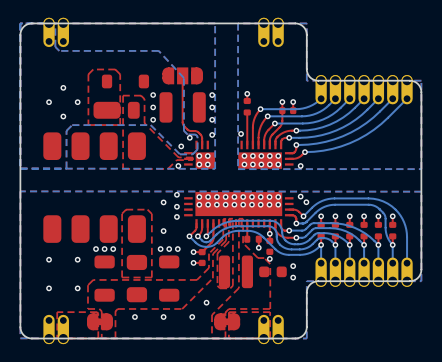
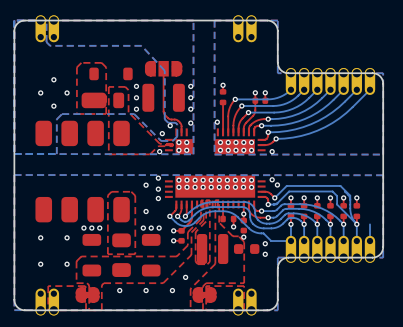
bottom track: (312, 207) (319, 202) (331, 198) (368, 198) (383, 201) (395, 209) (402, 218) (406, 229) (407, 245) -> (282, 190) (286, 185) (340, 185) (350, 195) (350, 200)
bottom track: (379, 209) (370, 204) (332, 204) (324, 206) (315, 212) -> (356, 224) (337, 204) (337, 195) (332, 191) (289, 191) (285, 194)
bottom track: (321, 244) (307, 253) (291, 254) -> (290, 241) (271, 241) (263, 233)

